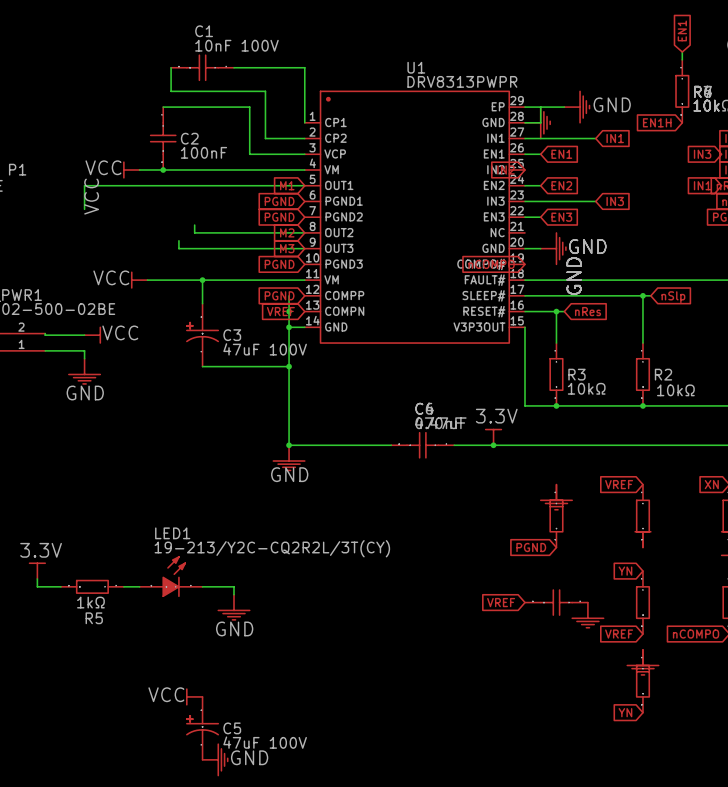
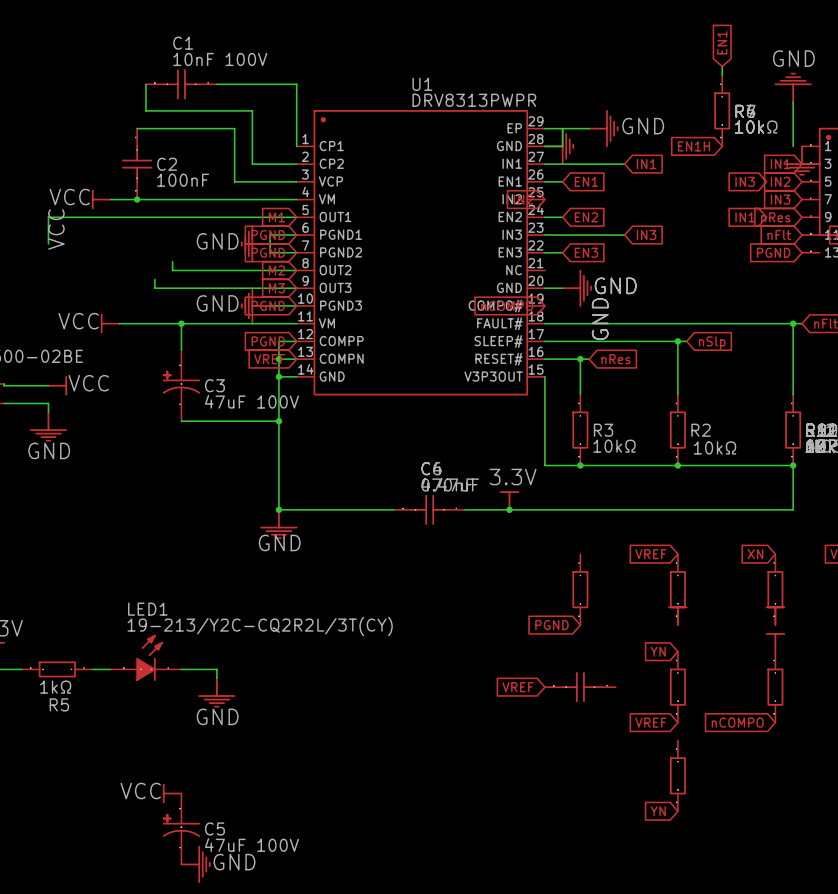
wire: none -> (296, 235) (270, 235) (270, 252) (296, 252)
power symbol: none -> GND (255, 243)
power symbol: none -> GND (255, 305)
wire: none -> (270, 305) (296, 305)
wire: none -> (278, 341) (296, 341)
wire: none -> (278, 359) (296, 359)
power symbol: GND (556, 497) -> none
power symbol: GND (587, 615) -> none
power symbol: GND (642, 662) -> none

